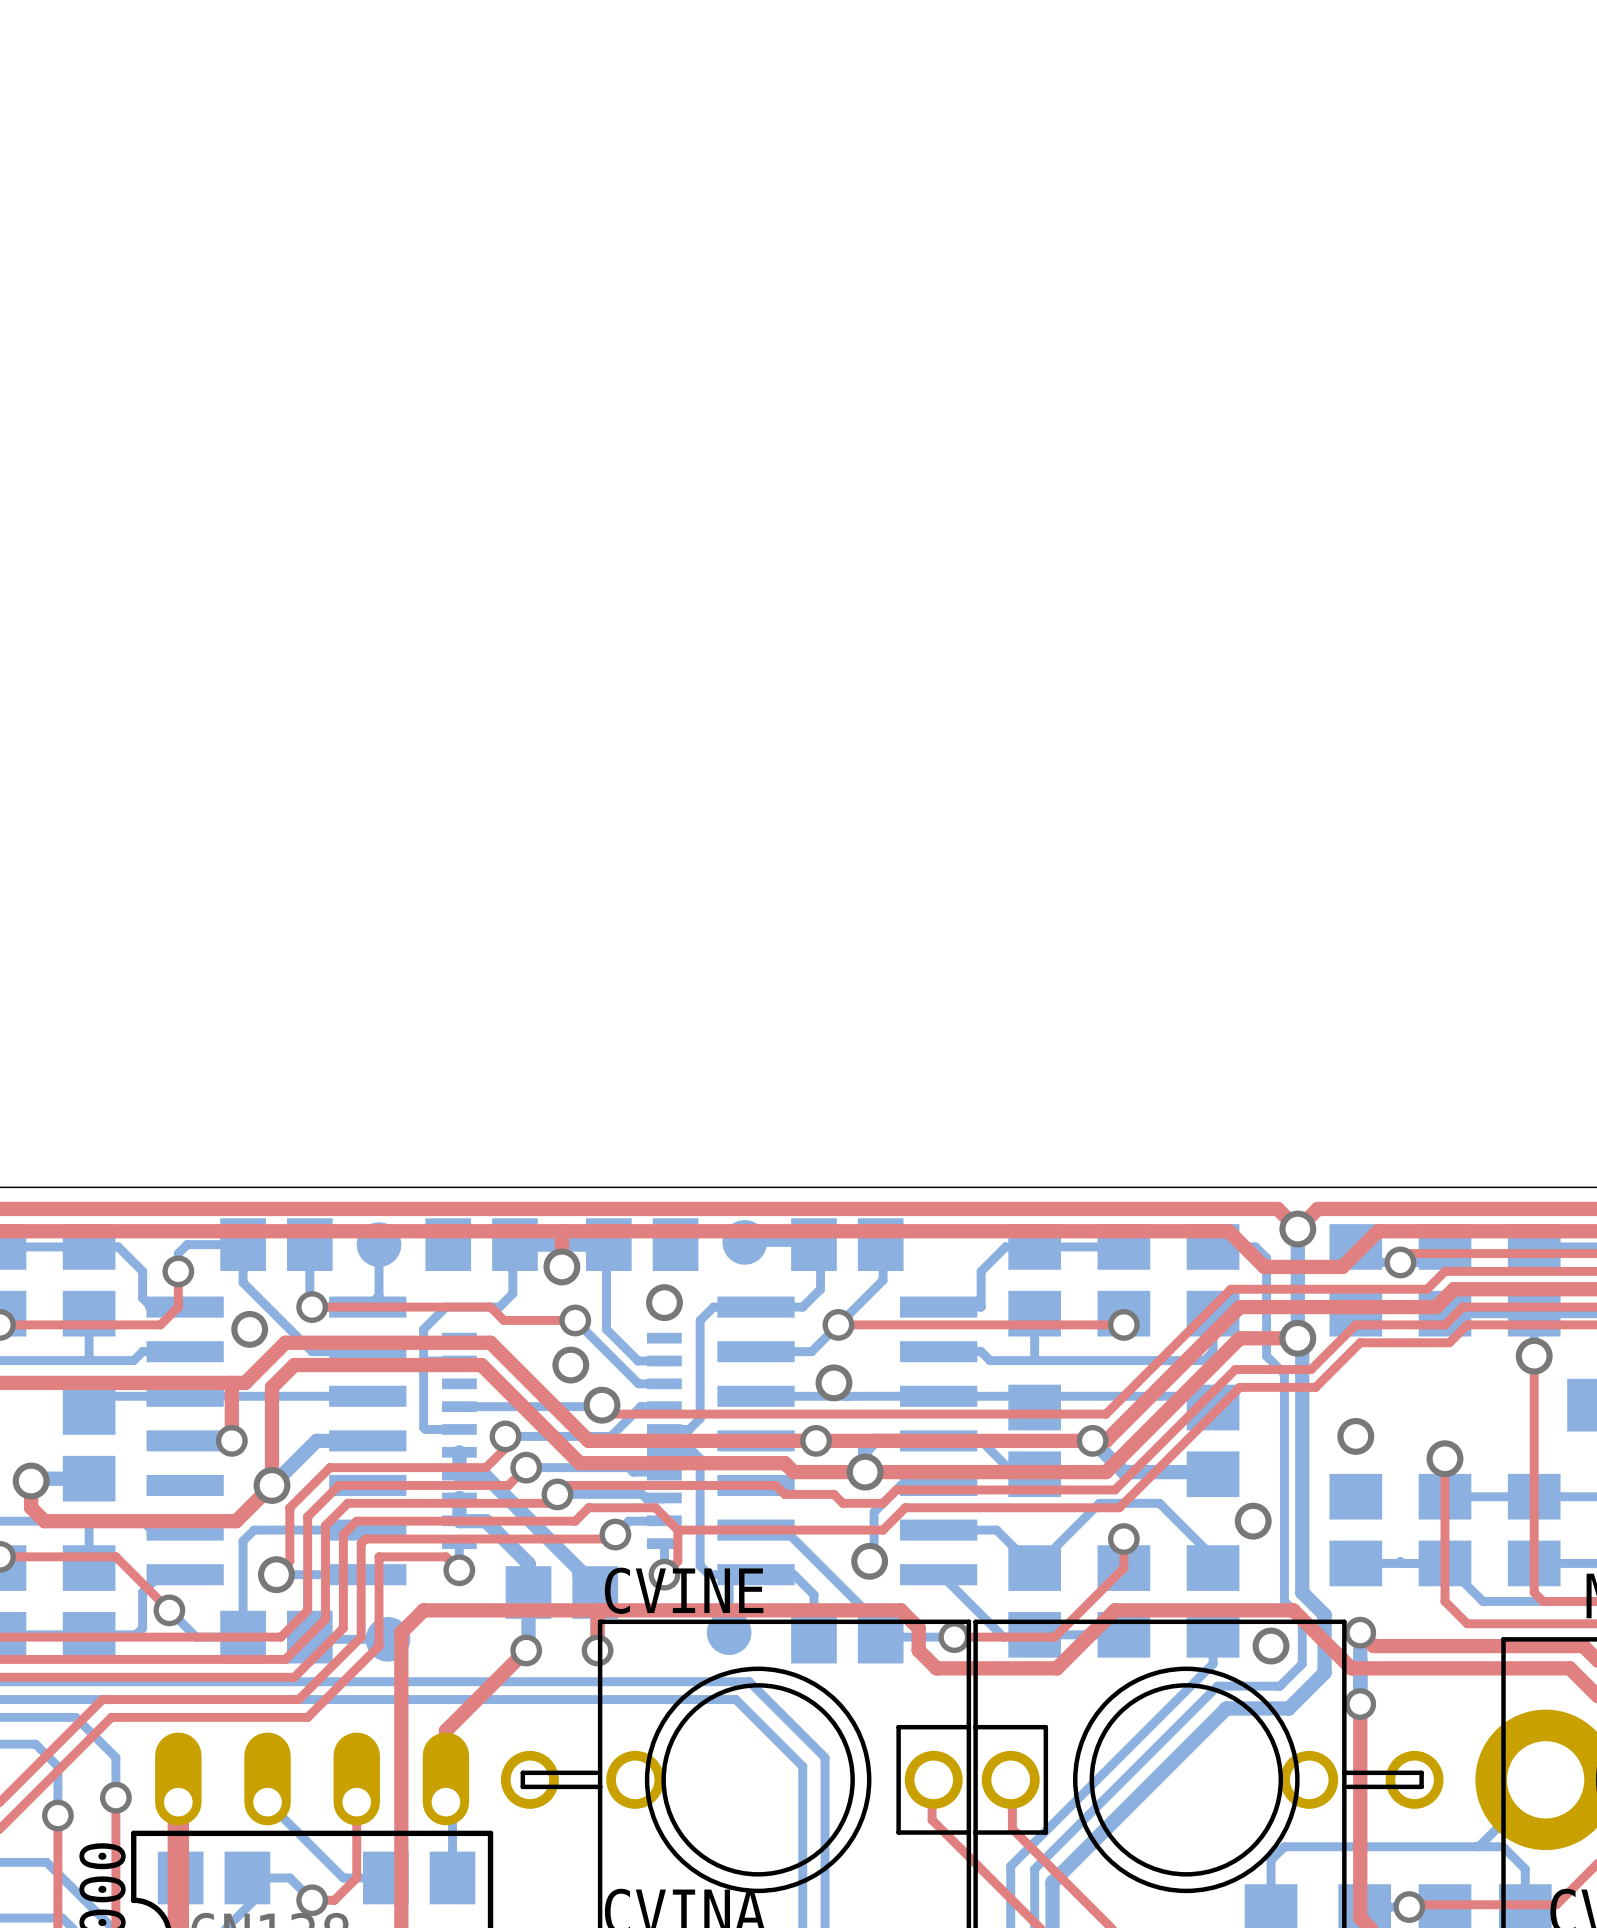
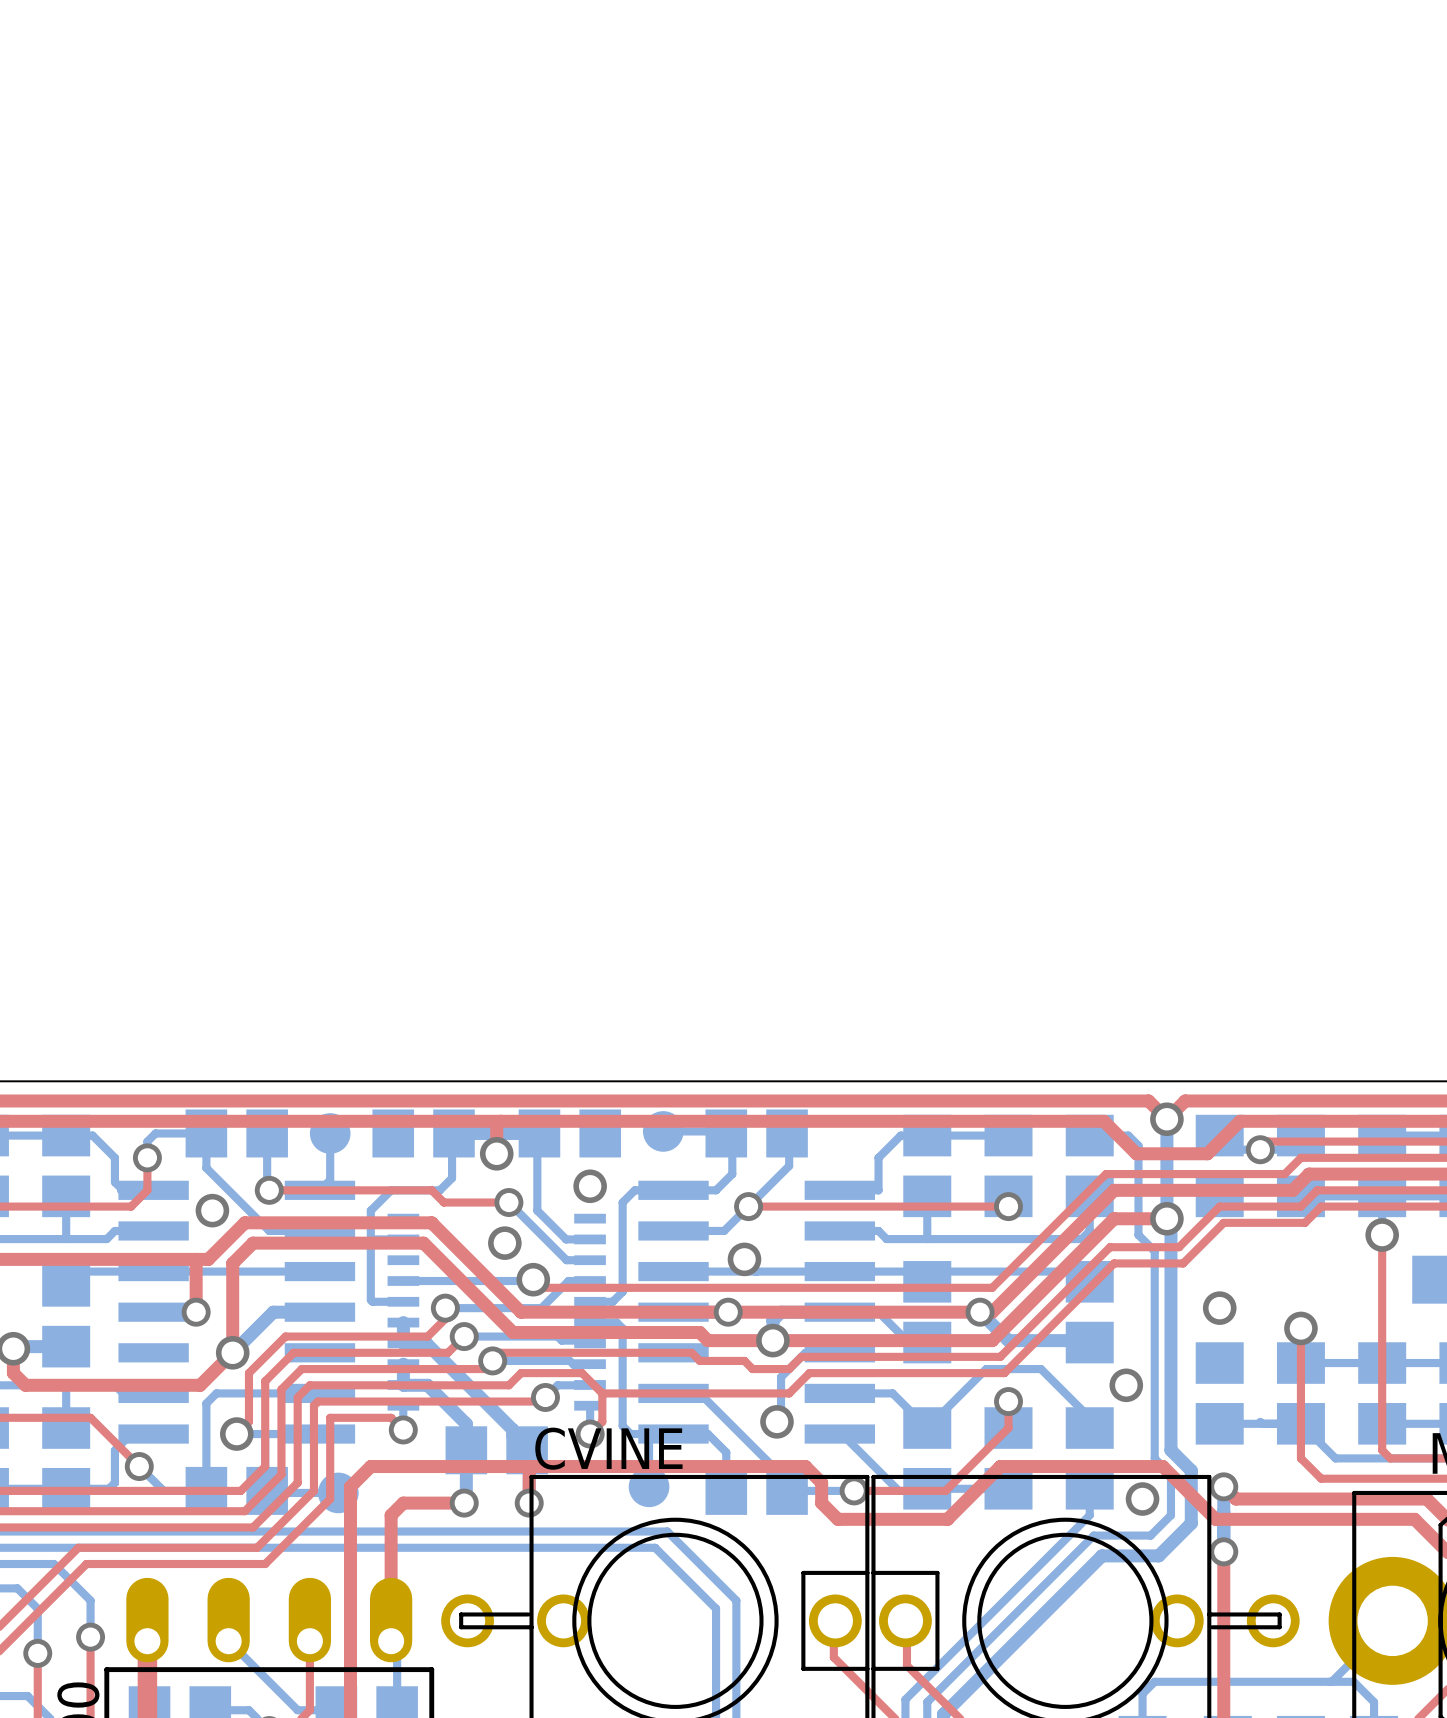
top track: (526, 1650) (445, 1730) -> (464, 1503) (403, 1503) (391, 1515) (391, 1576)

